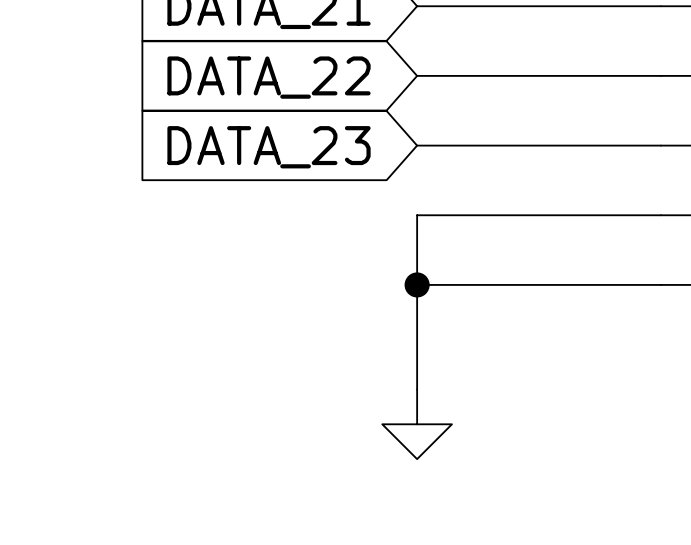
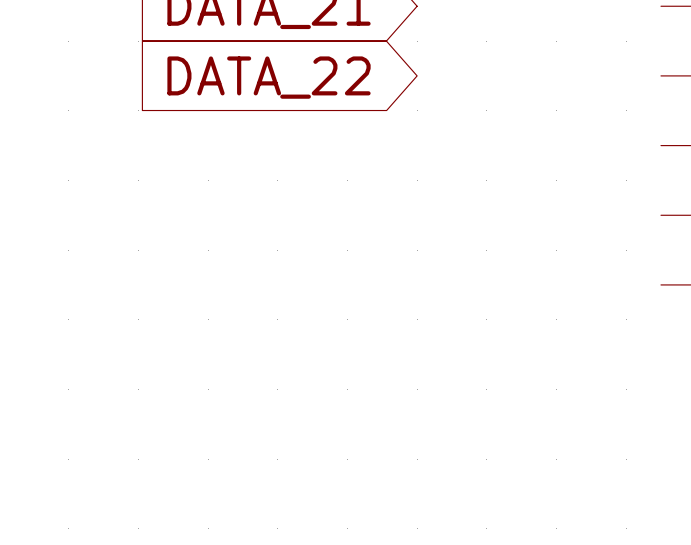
wire: (417, 6) (660, 6) -> none
wire: (417, 75) (660, 75) -> none
wire: (417, 145) (660, 145) -> none
global label: DATA_23 (269, 147) -> none
wire: (660, 215) (417, 215) (417, 389) -> none
wire: (417, 284) (660, 284) -> none
junction: (417, 284) -> none
power symbol: (417, 424) -> none

